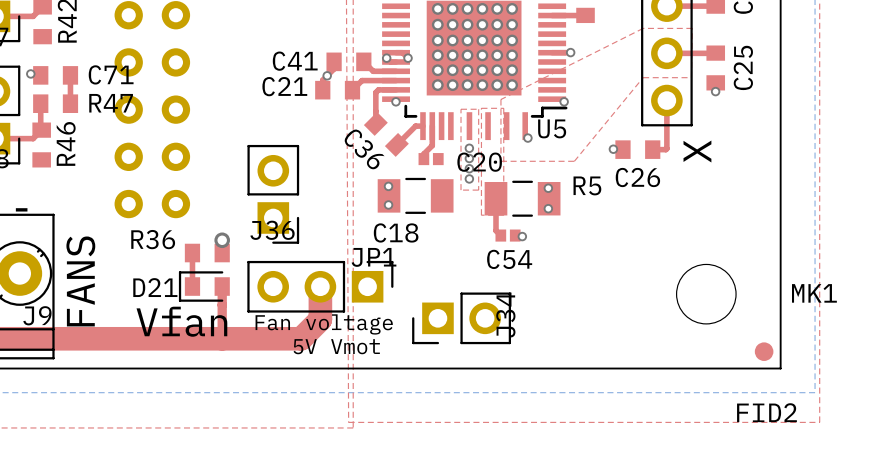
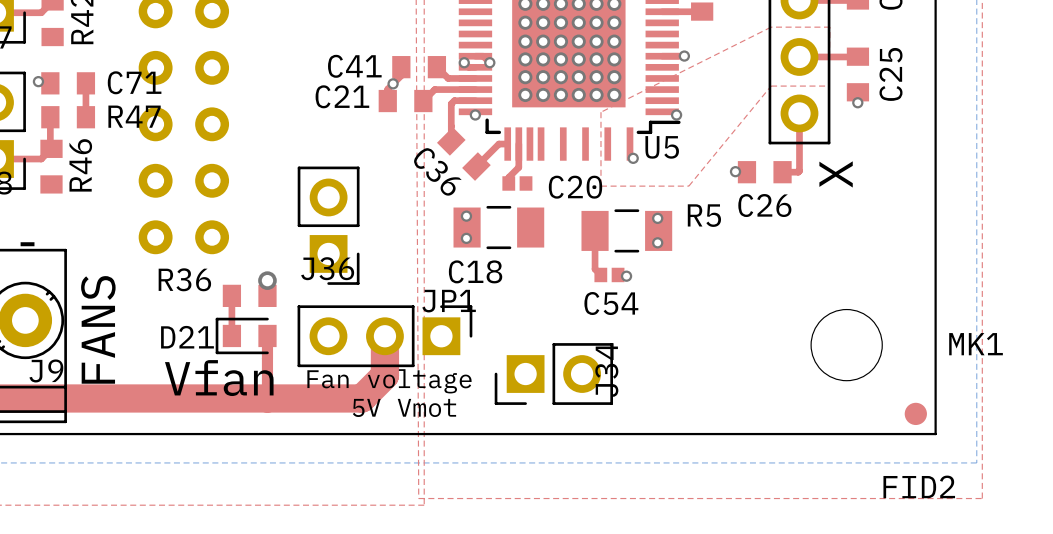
top zone outline: (481, 108) (481, 215) (503, 215) (503, 108) (481, 108) -> none
top zone outline: (461, 109) (461, 190) (478, 190) (478, 109) (461, 109) -> none
via: (469, 148) -> none
via: (469, 158) -> none
via: (469, 168) -> none
via: (469, 178) -> none

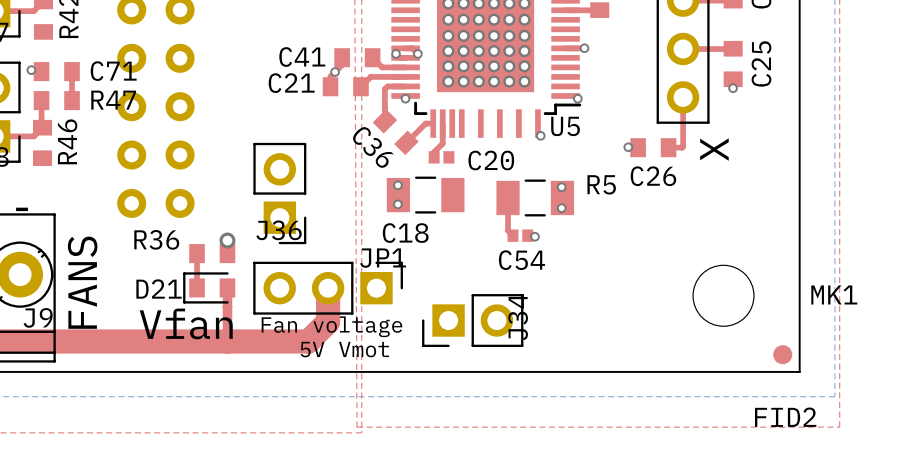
top zone outline: (771, 27) (830, 27) (828, 86) (771, 86) (688, 186) (600, 186) (600, 112) (771, 27) -> none

